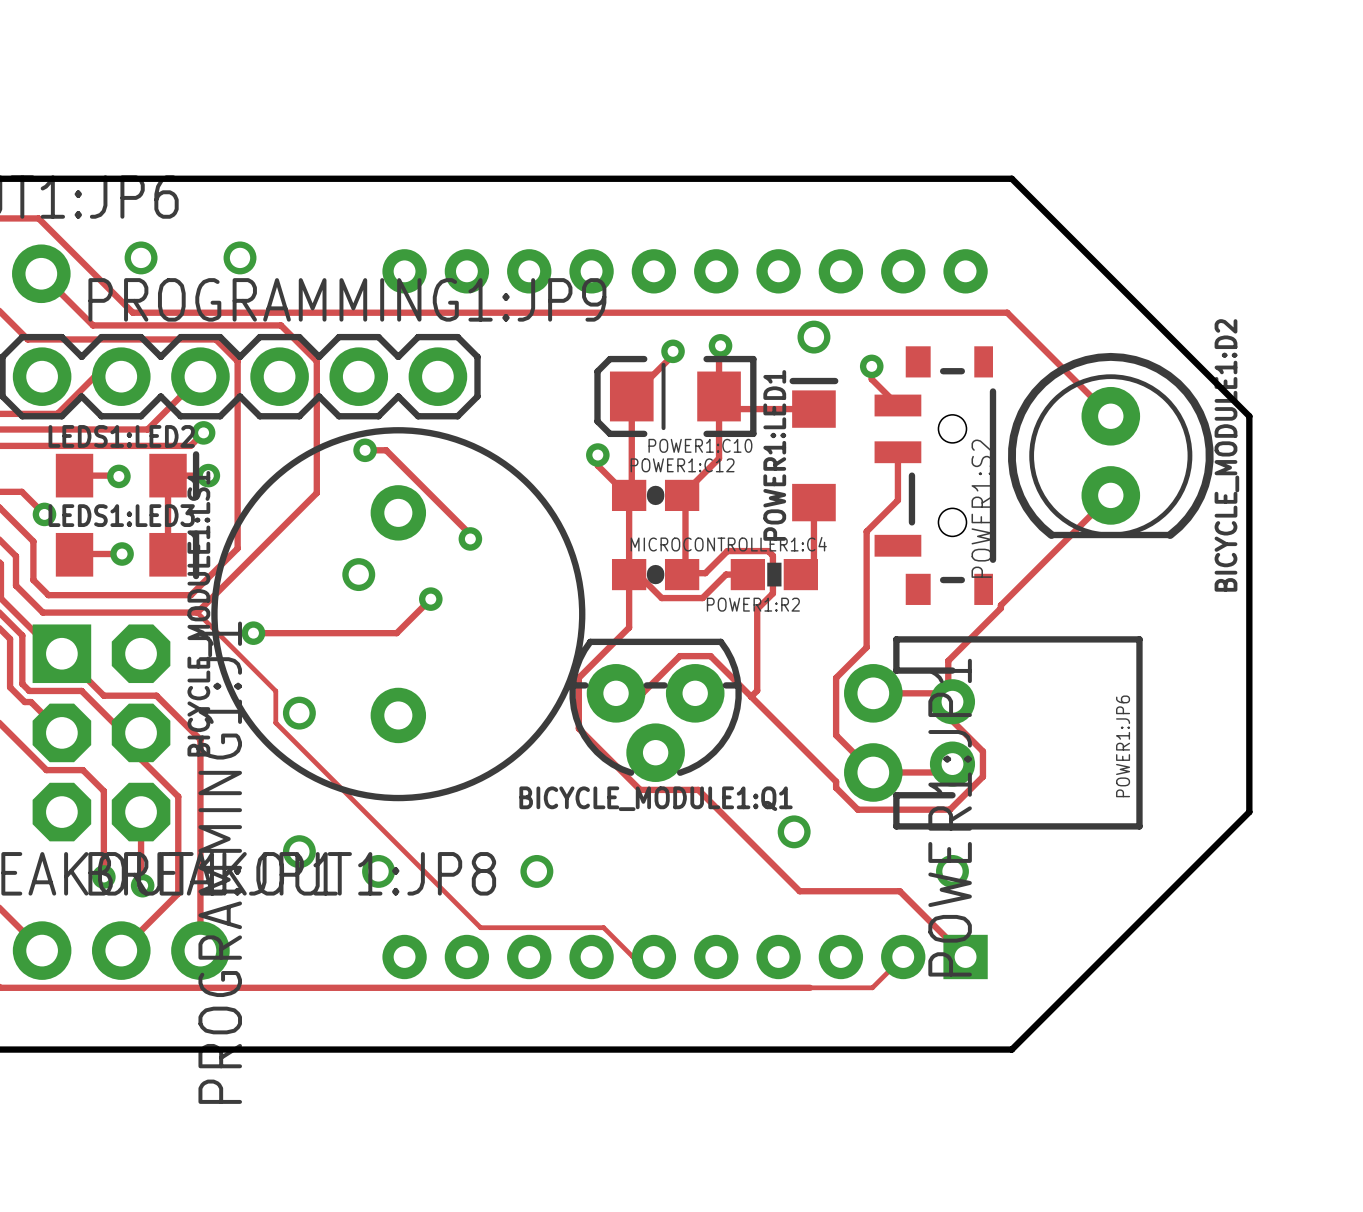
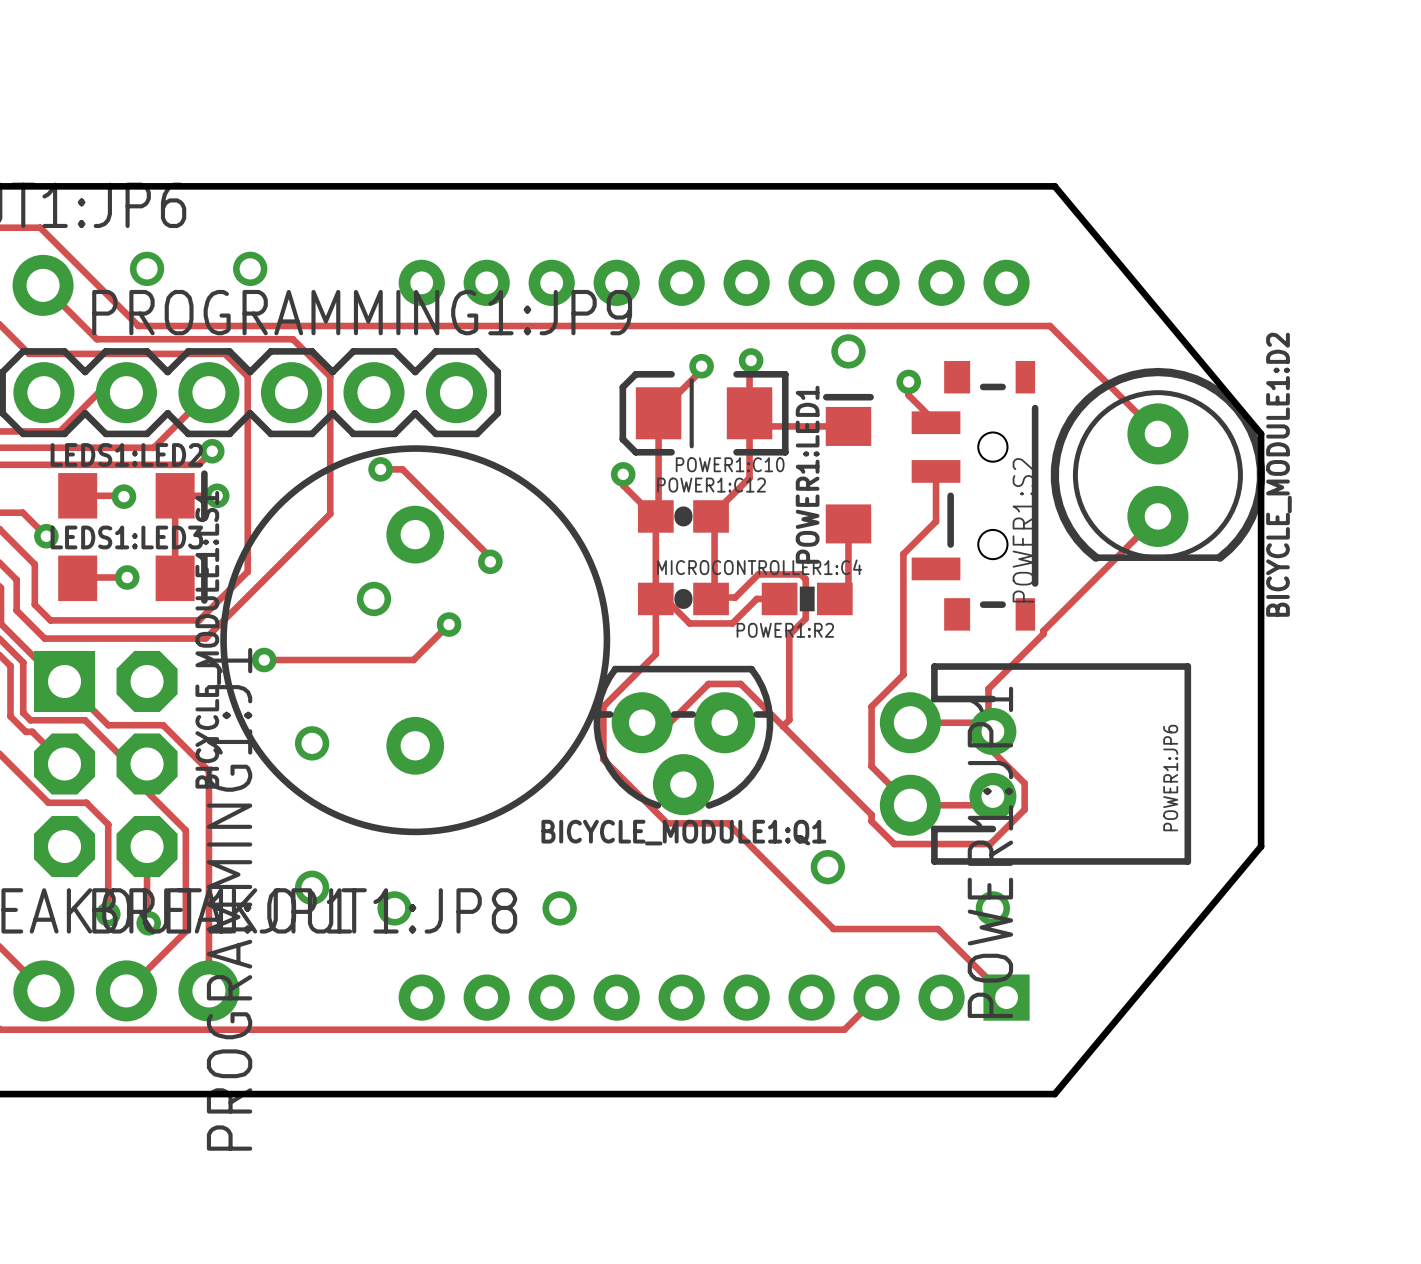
board edge: (1011, 178) (1249, 416) (1249, 812) (1011, 1049) -> (1054, 186) (1261, 433) (1261, 846) (1054, 1094)
track: (197, 612) (275, 691) (275, 722) (480, 927) (603, 927) (632, 956) (653, 956) -> none
track: (903, 956) (872, 987) (810, 987) -> (876, 997) (844, 1029)

